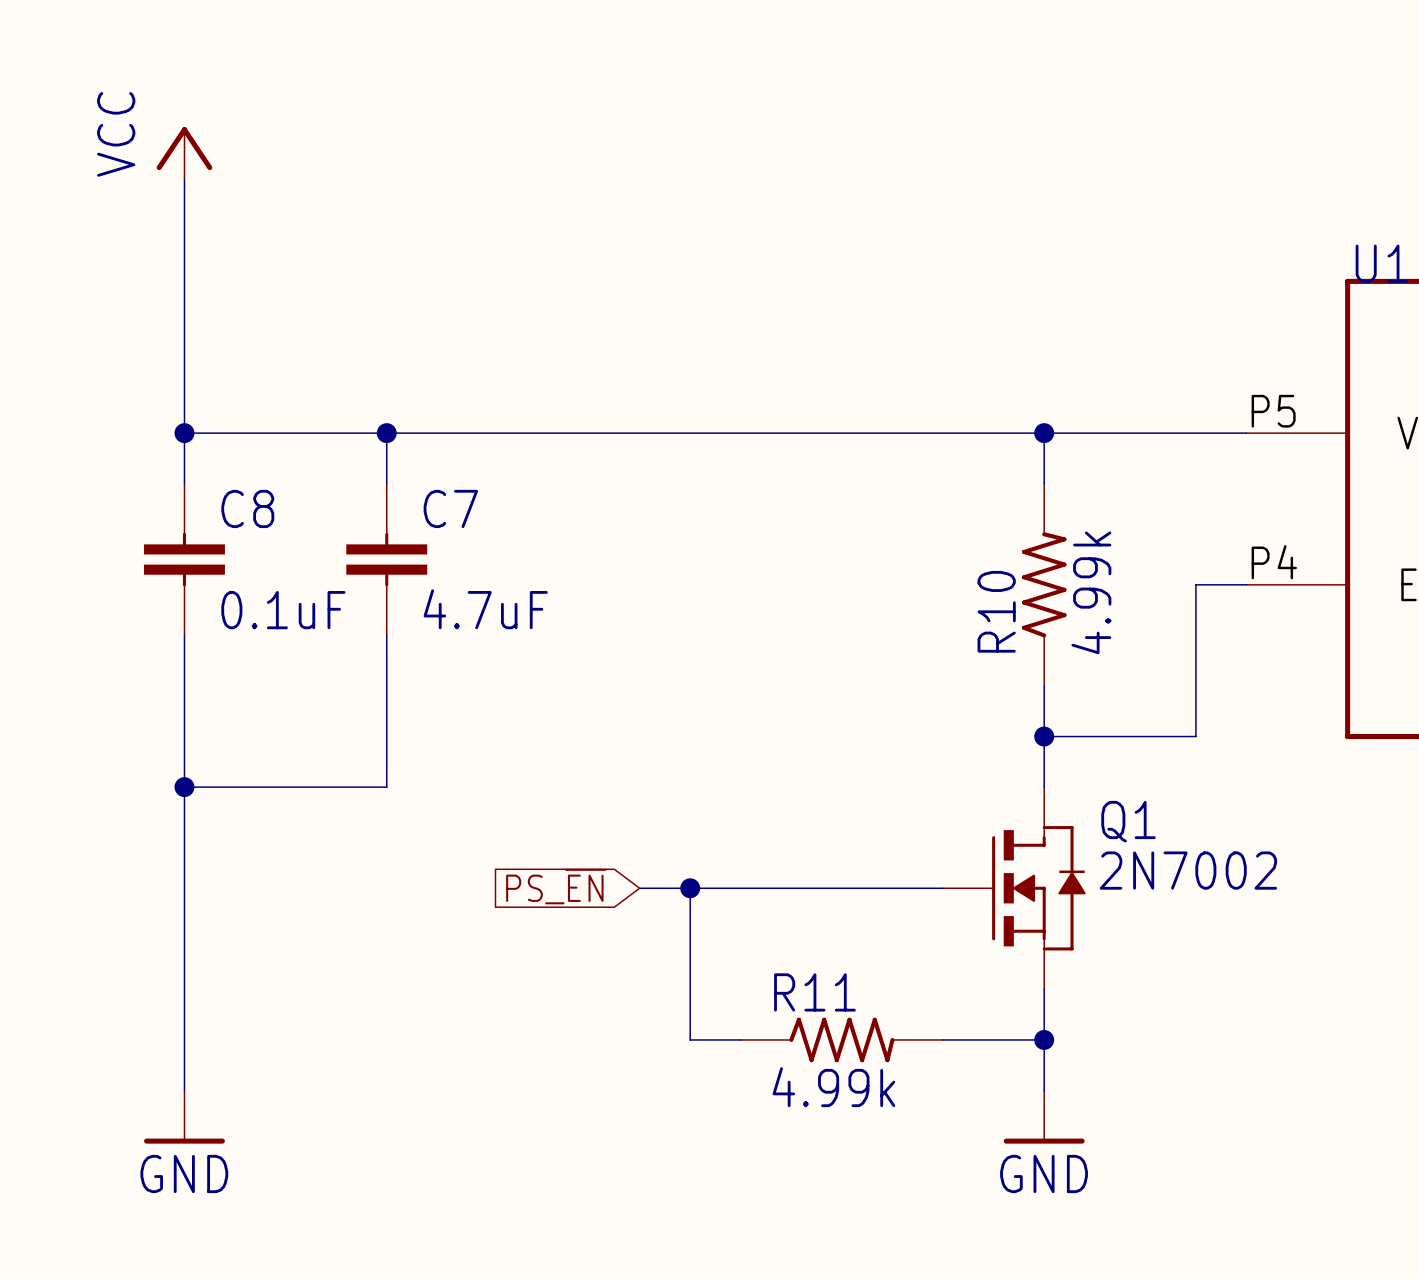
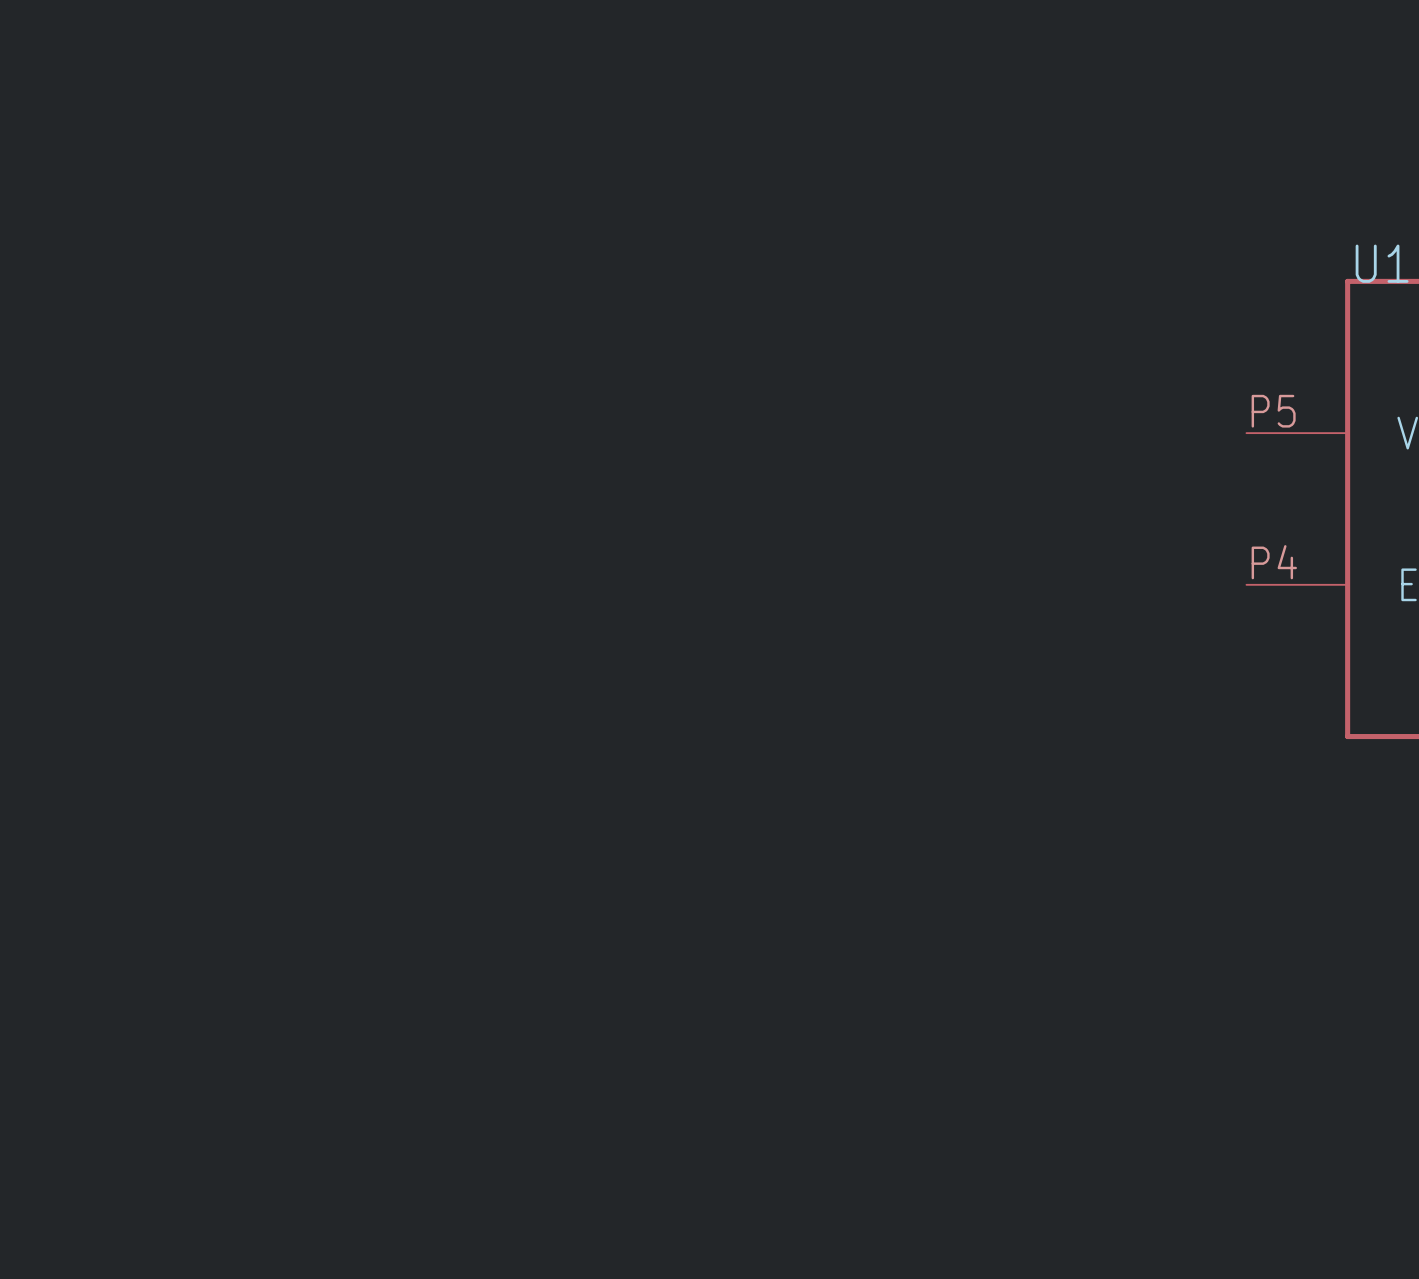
power symbol: VCC (184, 153) -> none
wire: (184, 180) (184, 483) -> none
wire: (184, 433) (1246, 433) -> none
junction: (184, 433) -> none
wire: (386, 433) (386, 483) -> none
junction: (386, 433) -> none
wire: (1044, 433) (1044, 483) -> none
junction: (1044, 433) -> none
C8: 0.1uF (184, 559) -> none
C7: 4.7uF (386, 559) -> none
R10: 4.99k (1044, 584) -> none
wire: (1246, 584) (1195, 584) (1195, 736) (1044, 736) -> none
wire: (184, 635) (184, 1090) -> none
wire: (386, 635) (386, 787) (184, 787) -> none
wire: (1044, 685) (1044, 787) -> none
junction: (1044, 736) -> none
junction: (184, 787) -> none
global label: PS_~{EN} (556, 886) -> none
wire: (639, 888) (943, 888) -> none
wire: (690, 888) (690, 1039) (740, 1039) -> none
junction: (690, 888) -> none
Q1: 2N7002 (1014, 888) -> none
wire: (1044, 989) (1044, 1090) -> none
R11: 4.99k (841, 1039) -> none
wire: (943, 1039) (1044, 1039) -> none
junction: (1044, 1039) -> none
power symbol: GND (184, 1117) -> none
power symbol: GND (1044, 1117) -> none

